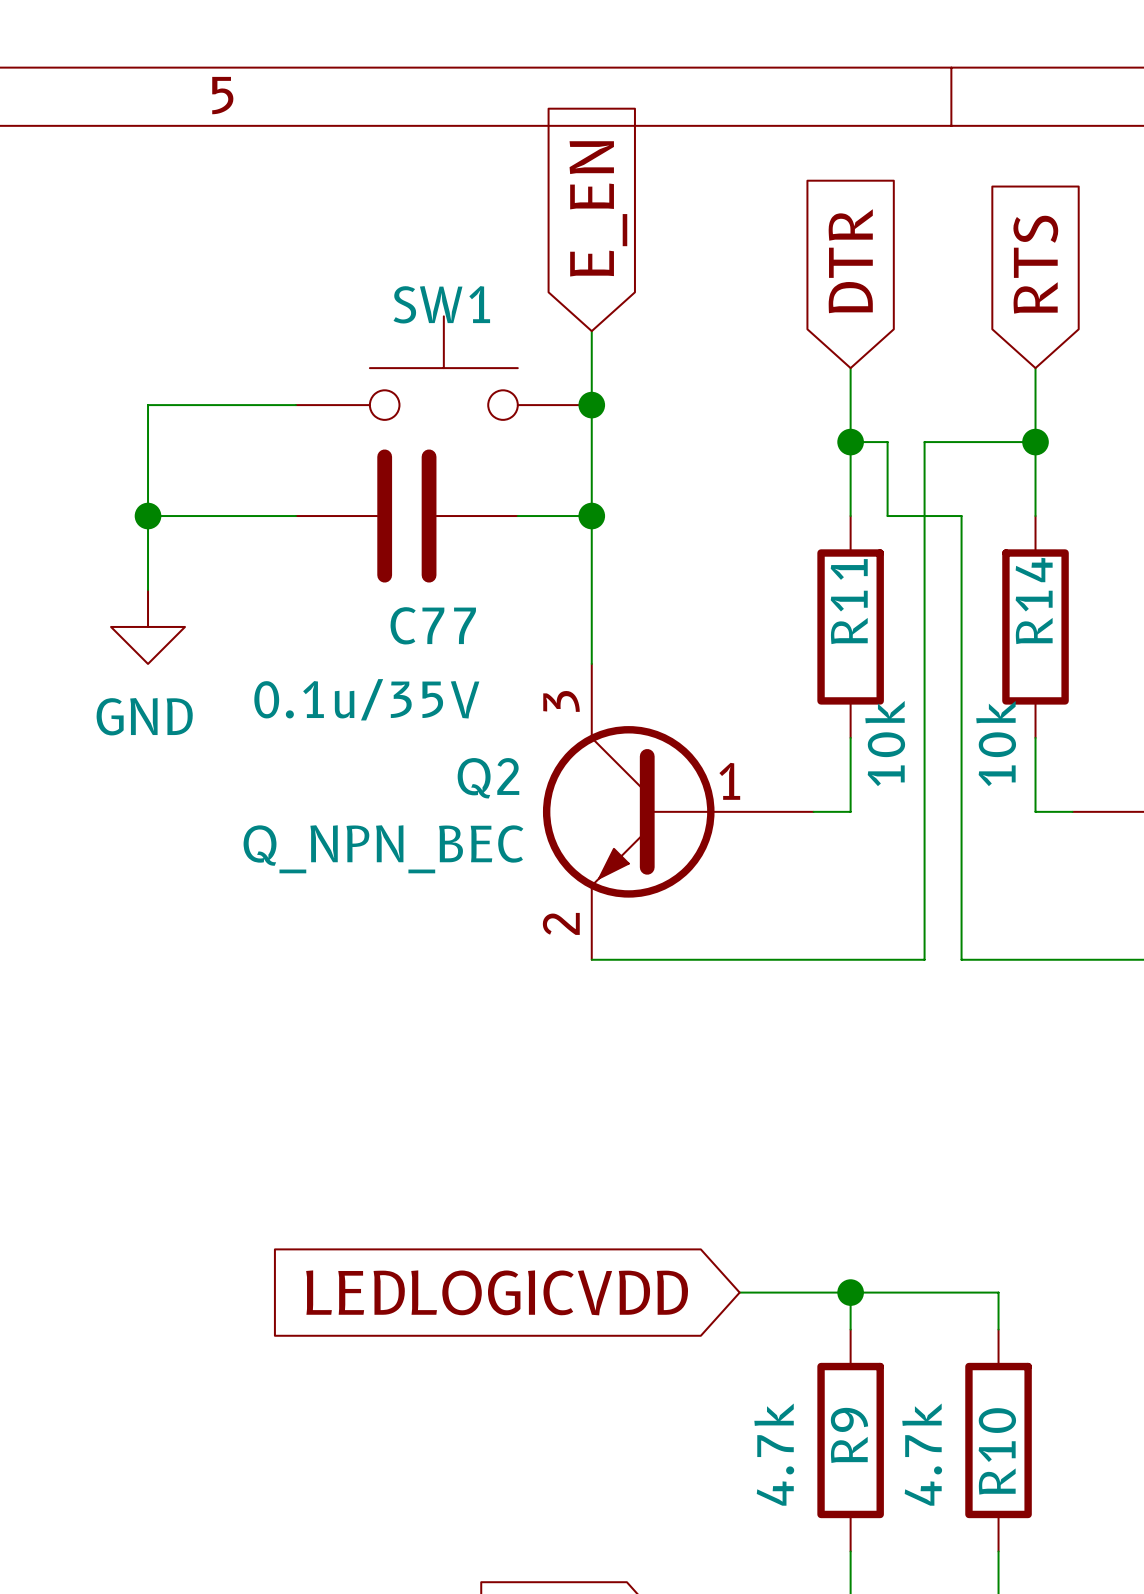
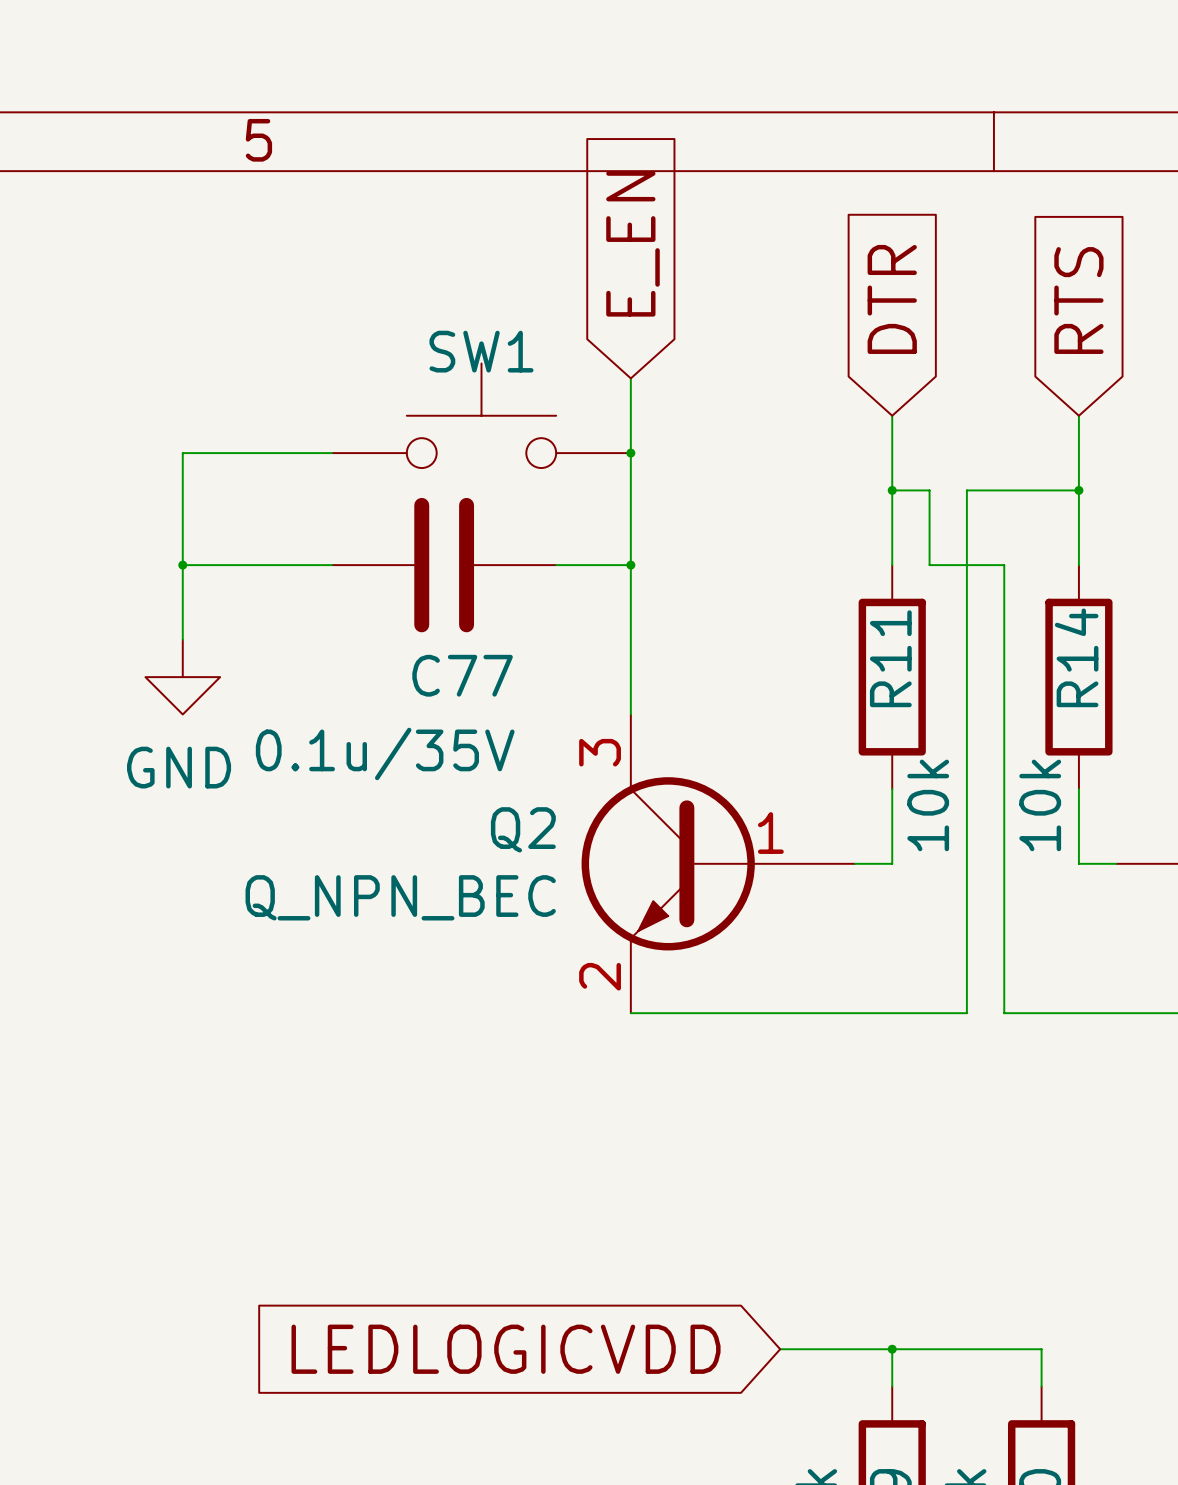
junction size: [578, 391, 606, 419] -> [626, 448, 636, 458]
junction size: [837, 428, 864, 456] -> [887, 485, 897, 495]
junction size: [1022, 428, 1049, 456] -> [1074, 485, 1084, 495]
junction size: [134, 502, 162, 530] -> [178, 560, 188, 570]
junction size: [578, 502, 606, 530] -> [626, 560, 636, 570]
junction size: [837, 1279, 864, 1306] -> [887, 1344, 897, 1354]

